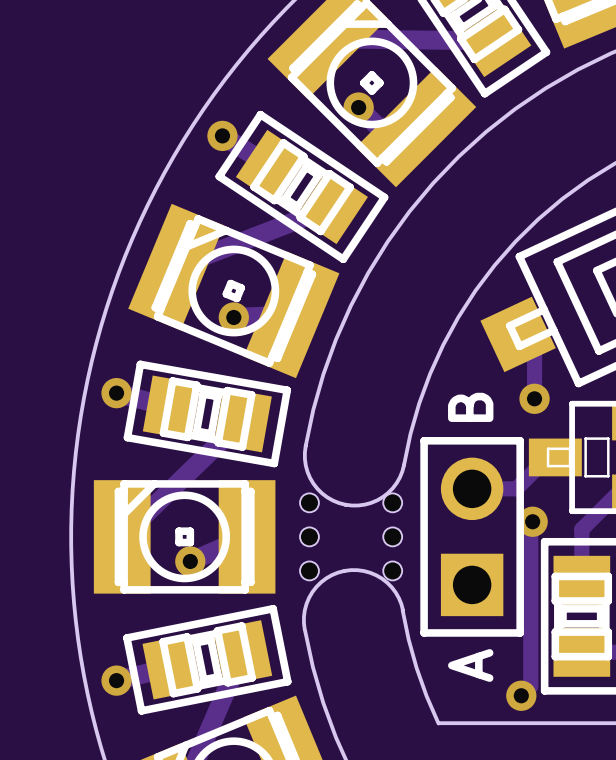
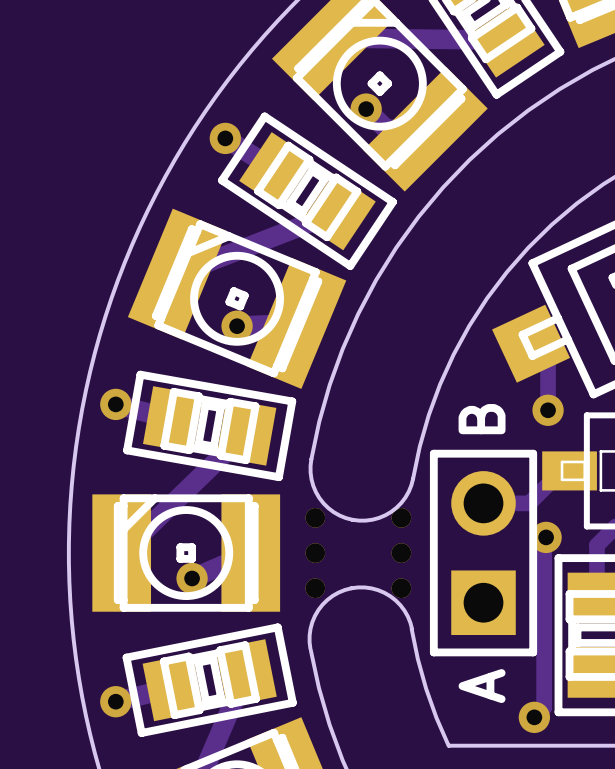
part footprint: [300, 493, 403, 581] -> [305, 508, 412, 599]

